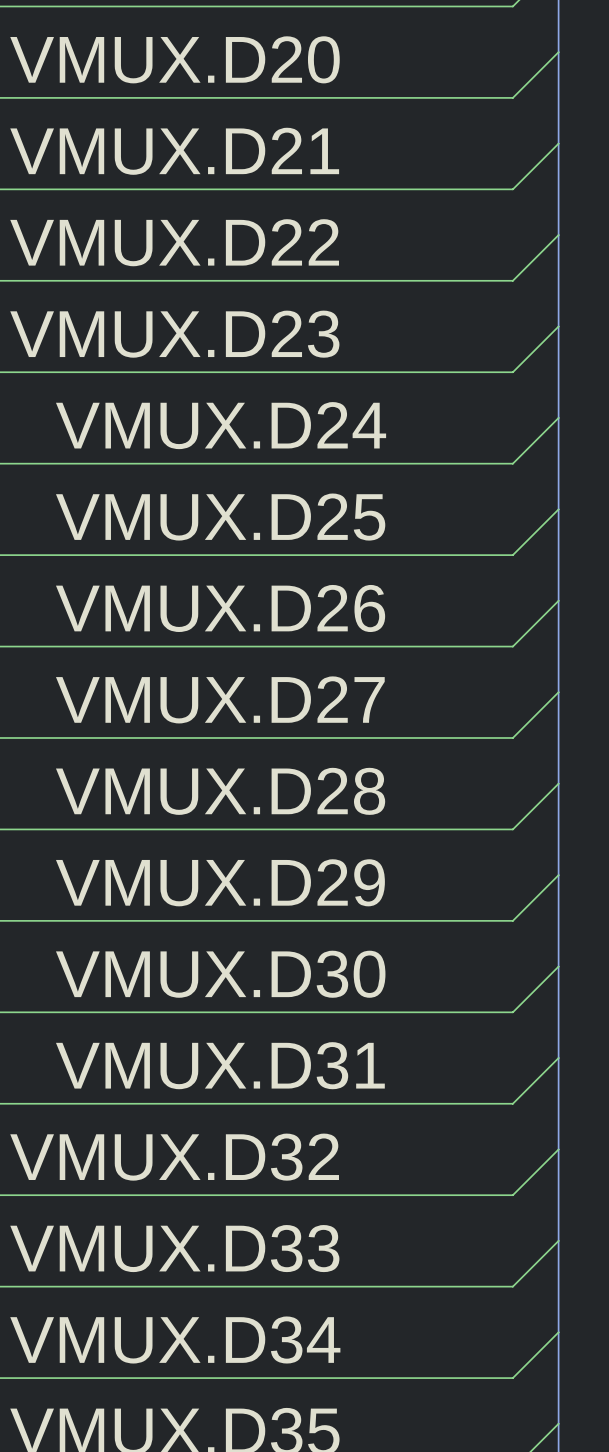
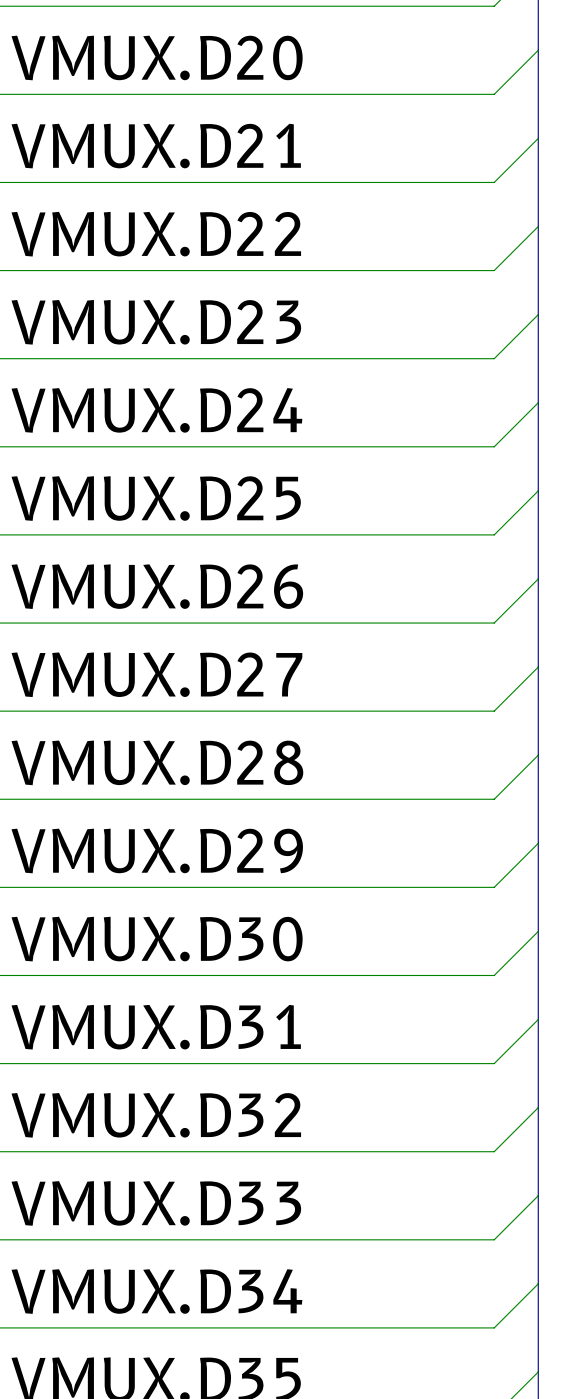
label position: VMUX.D24 (221, 425) -> VMUX.D24 (156, 410)
label position: VMUX.D25 (220, 517) -> VMUX.D25 (156, 498)
label position: VMUX.D26 (220, 608) -> VMUX.D26 (157, 586)
label position: VMUX.D27 (220, 699) -> VMUX.D27 (156, 674)
label position: VMUX.D28 (220, 791) -> VMUX.D28 (157, 762)
label position: VMUX.D29 (220, 882) -> VMUX.D29 (157, 850)
label position: VMUX.D30 (220, 974) -> VMUX.D30 (157, 939)
label position: VMUX.D31 (220, 1065) -> VMUX.D31 (156, 1027)

